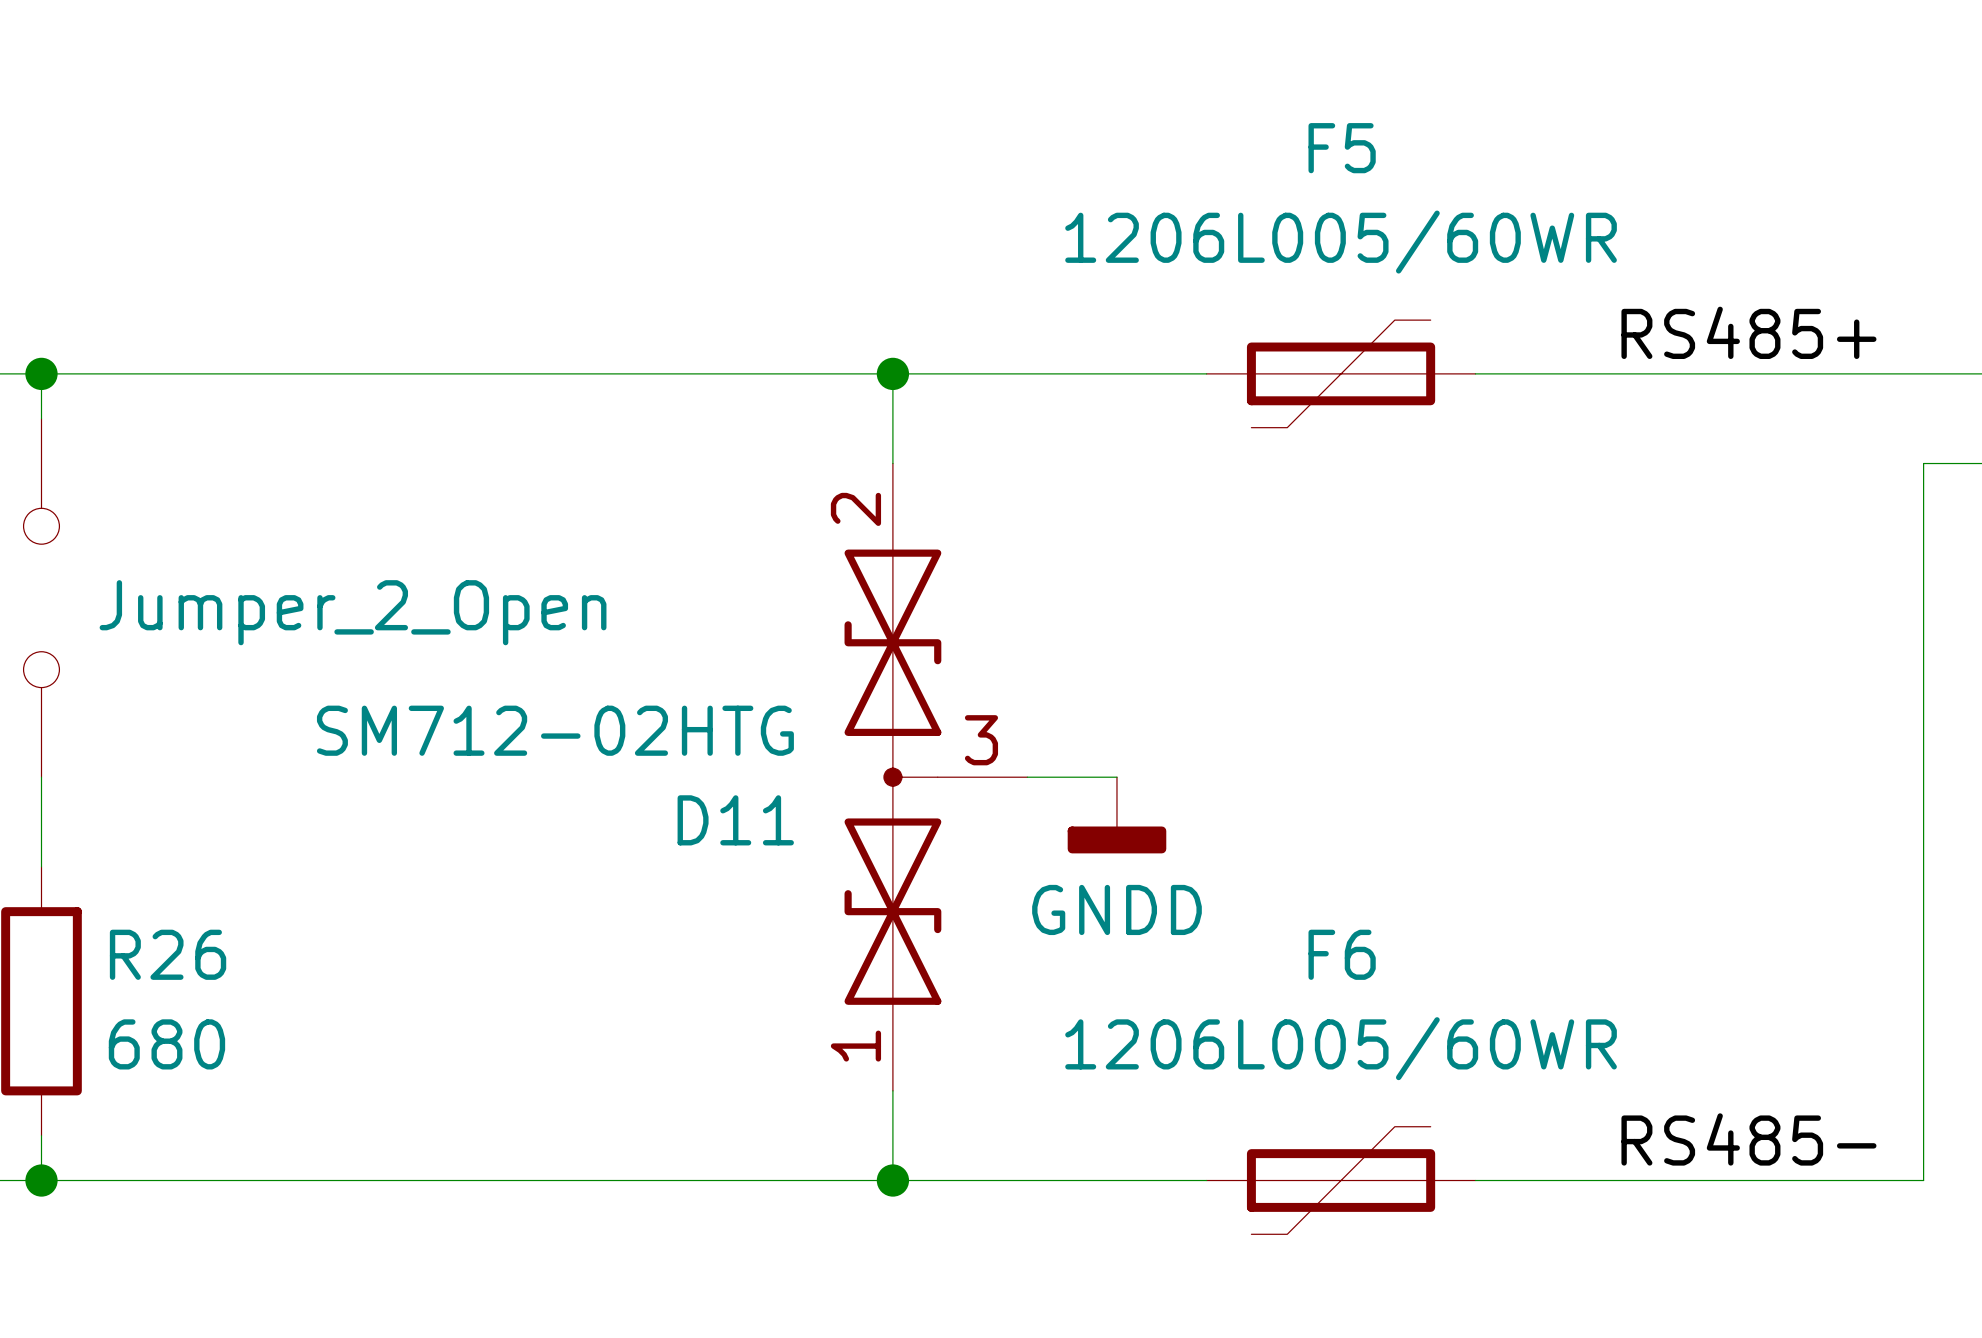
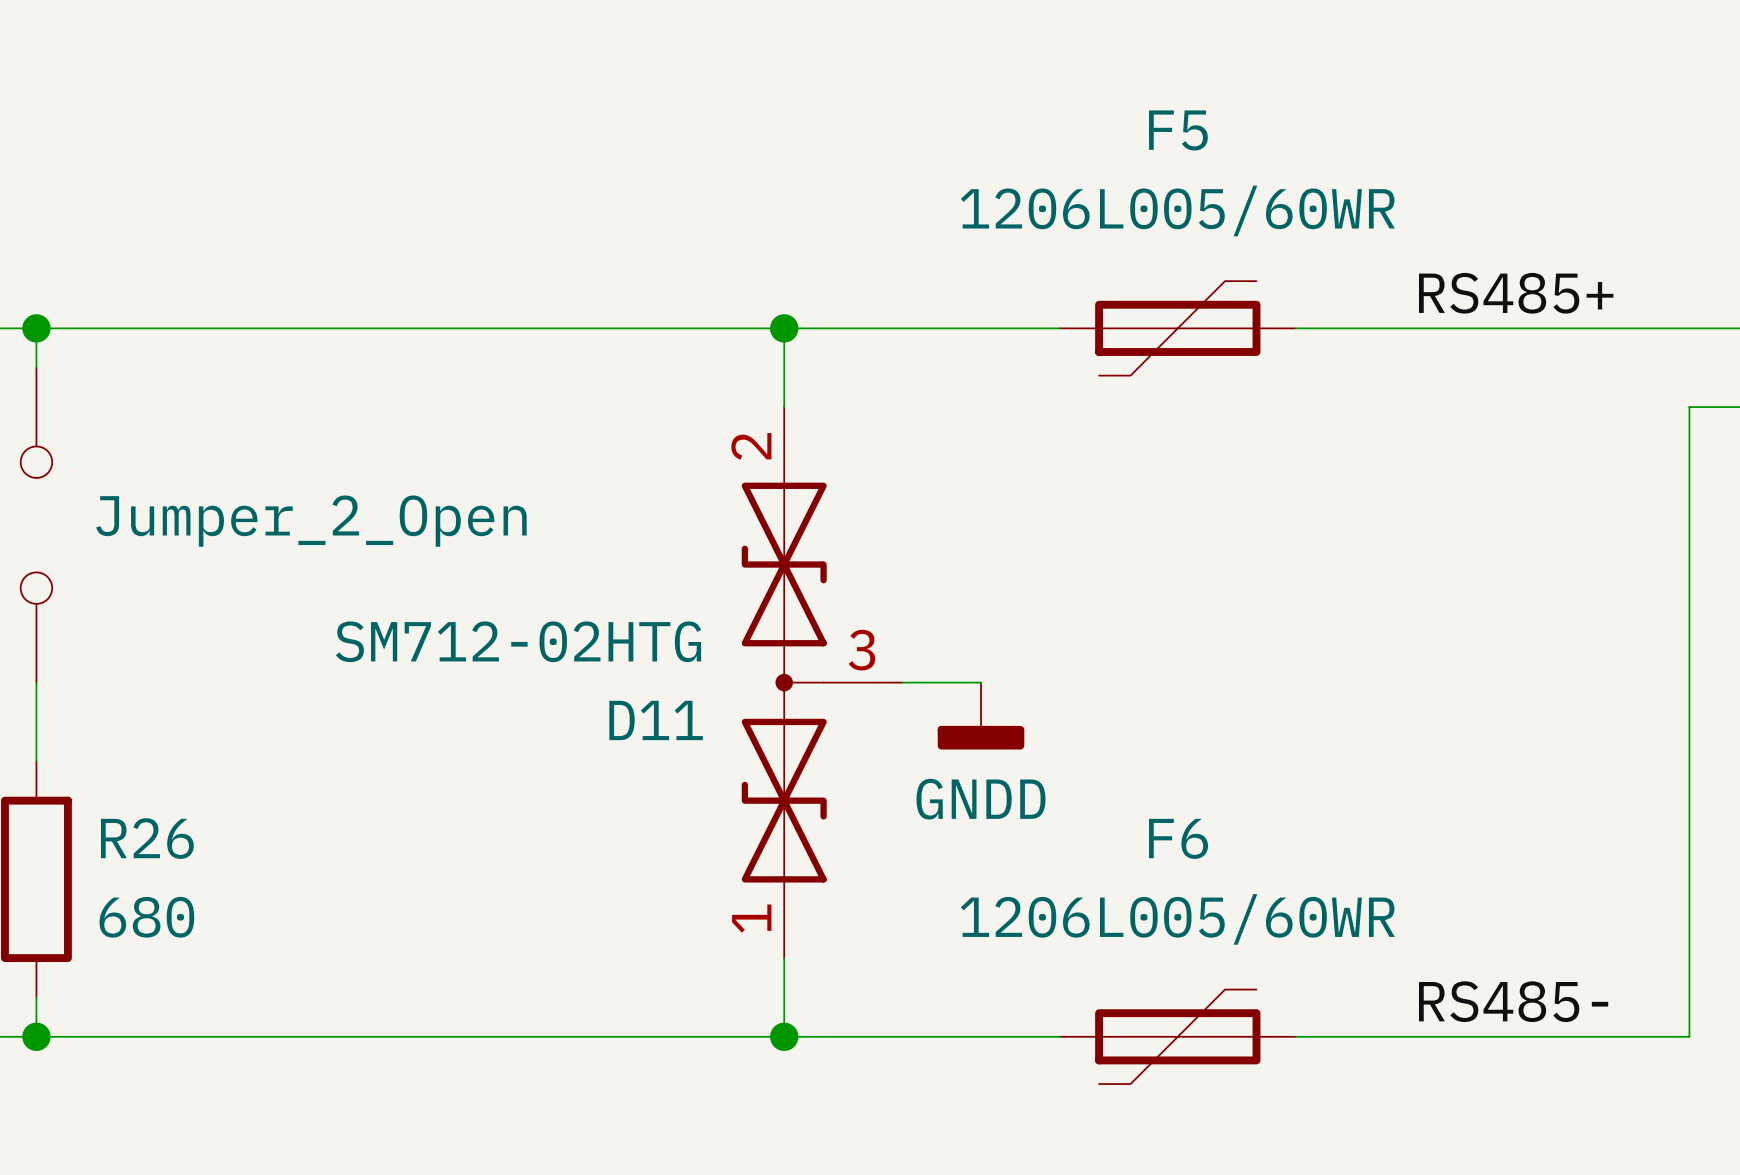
part value position: Jumper_2_Open (353, 612) -> Jumper_2_Open (311, 521)

